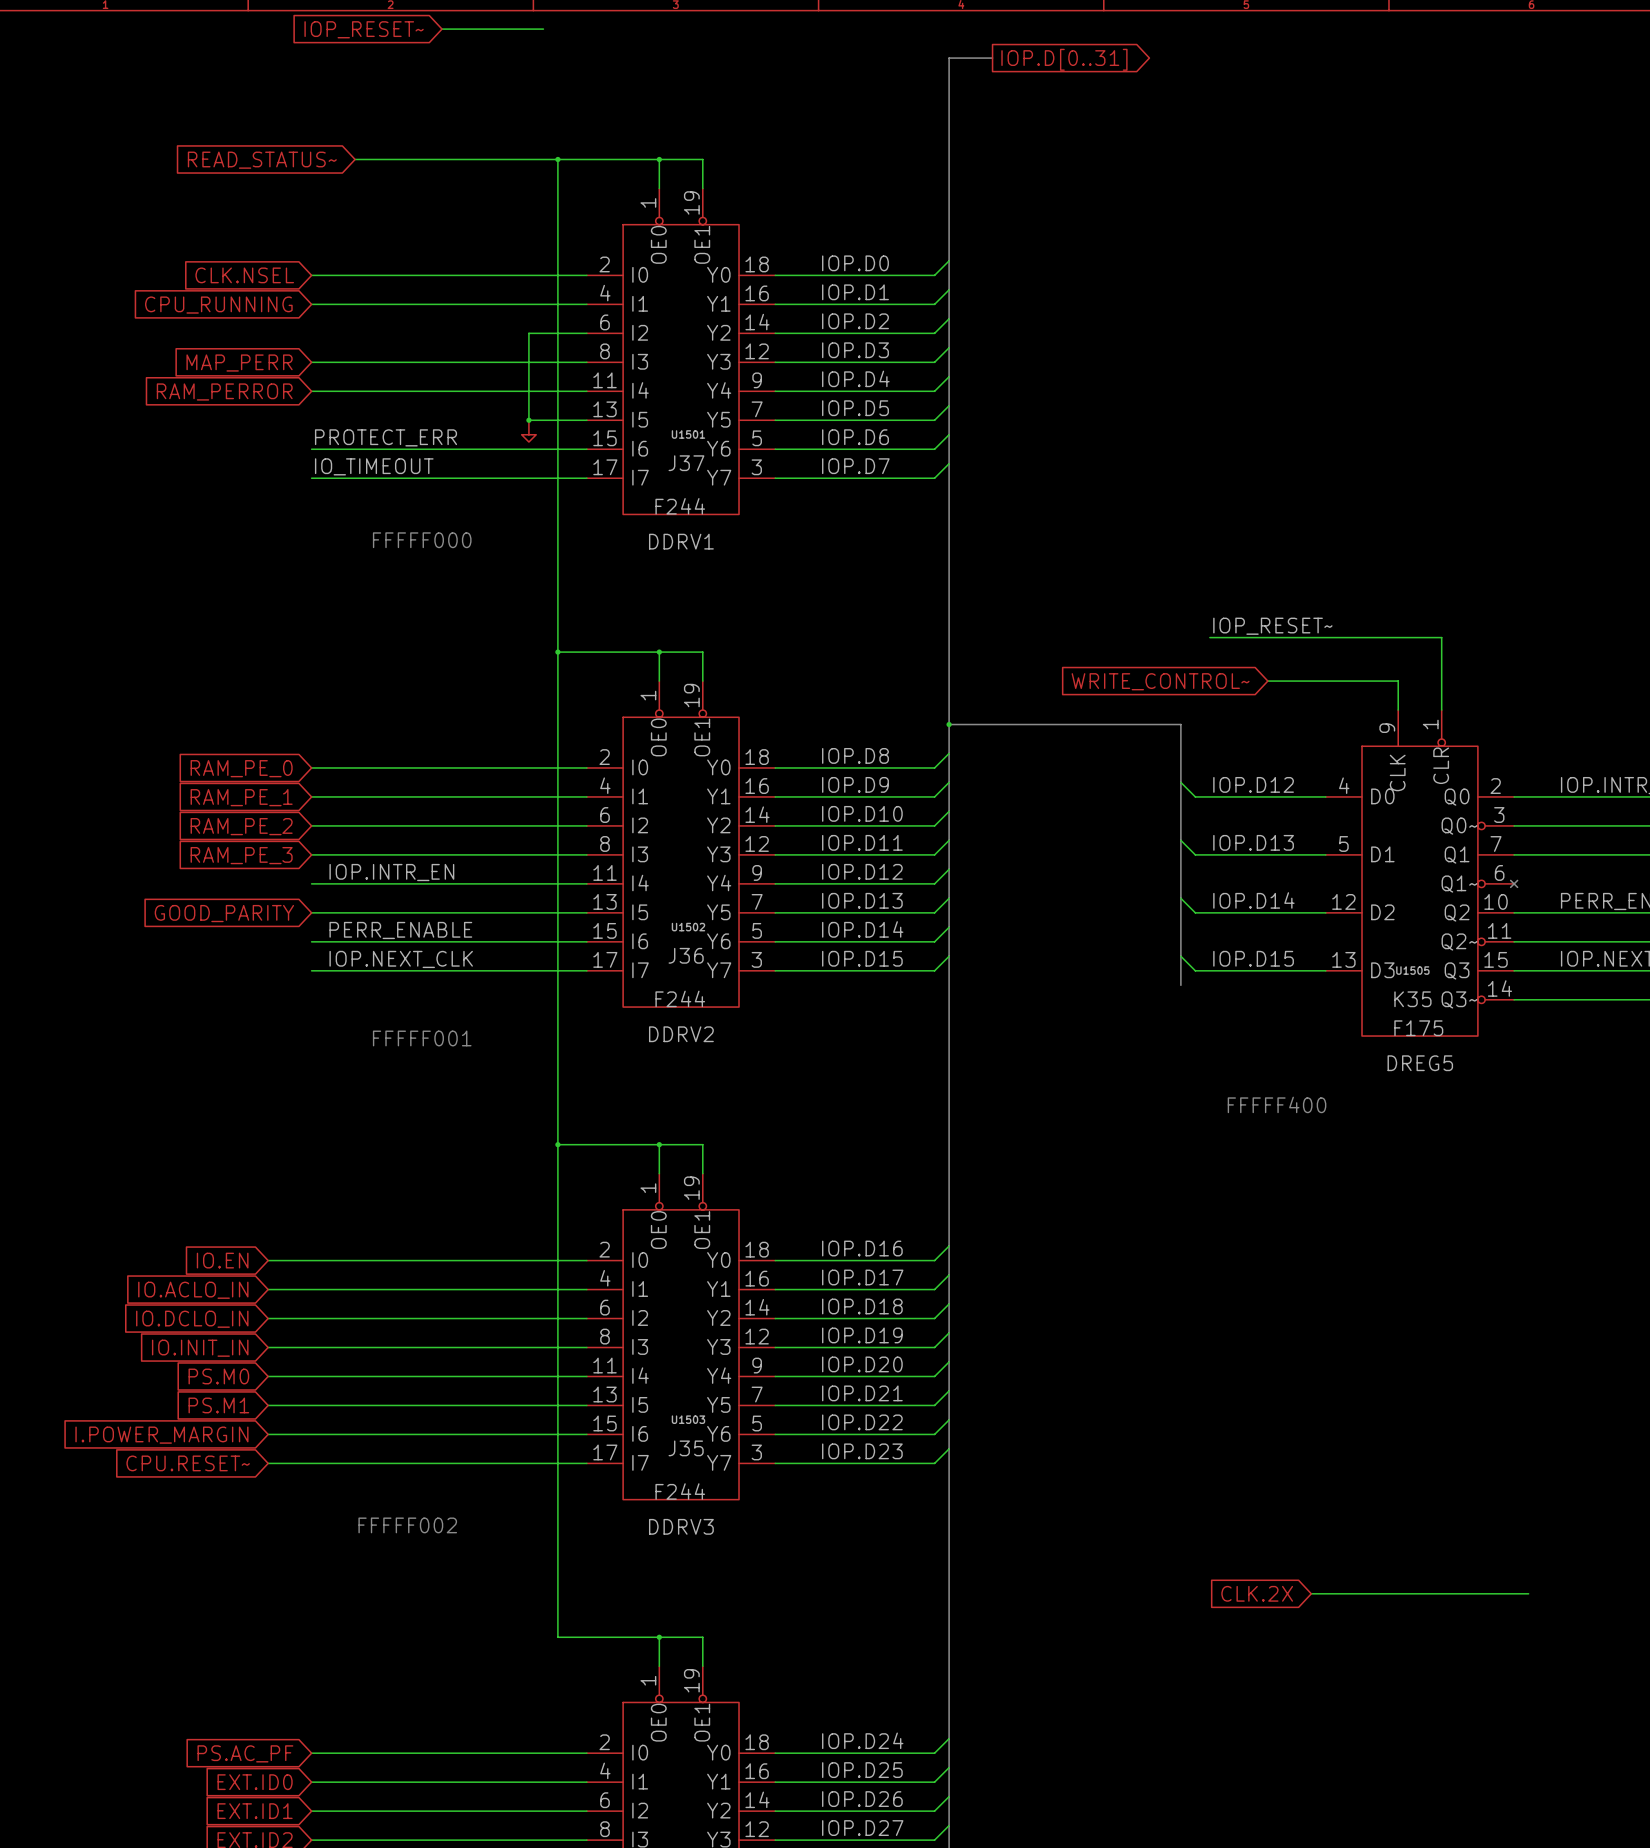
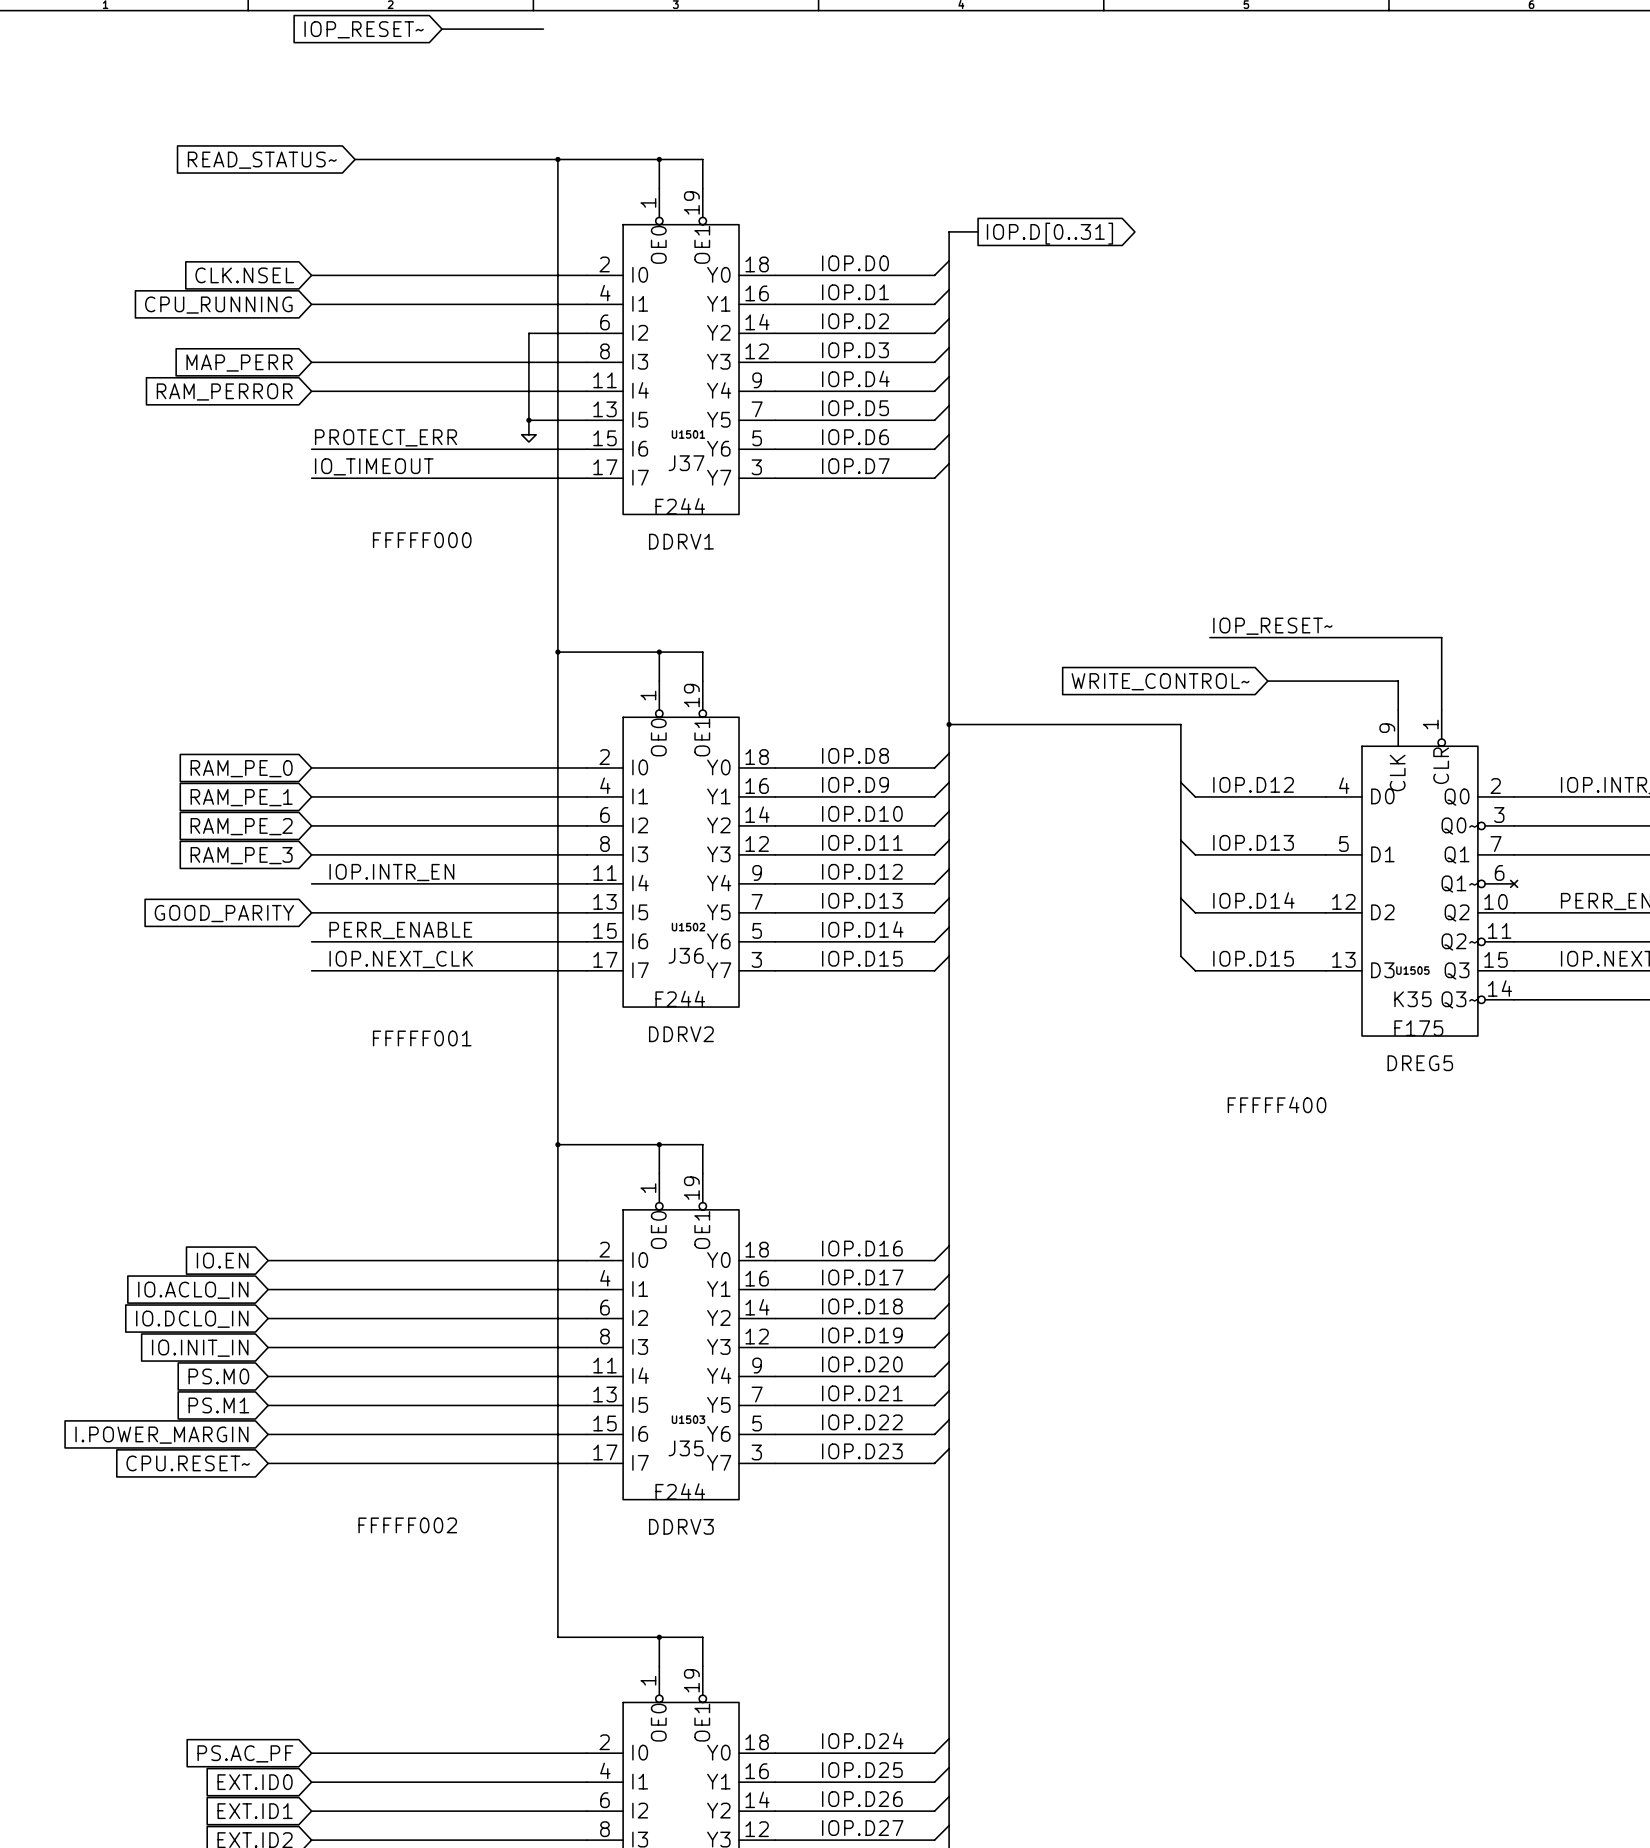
bus: (992, 58) (949, 58) (949, 231) -> (978, 231) (949, 231)
global label: IOP.D[0..31] (1064, 59) -> none
global label: none -> IOP.D[0..31] (1049, 233)
bus: (1180, 956) (1180, 985) -> none
global label: CLK.2X (1257, 1593) -> none
wire: (1311, 1593) (1528, 1593) -> none

